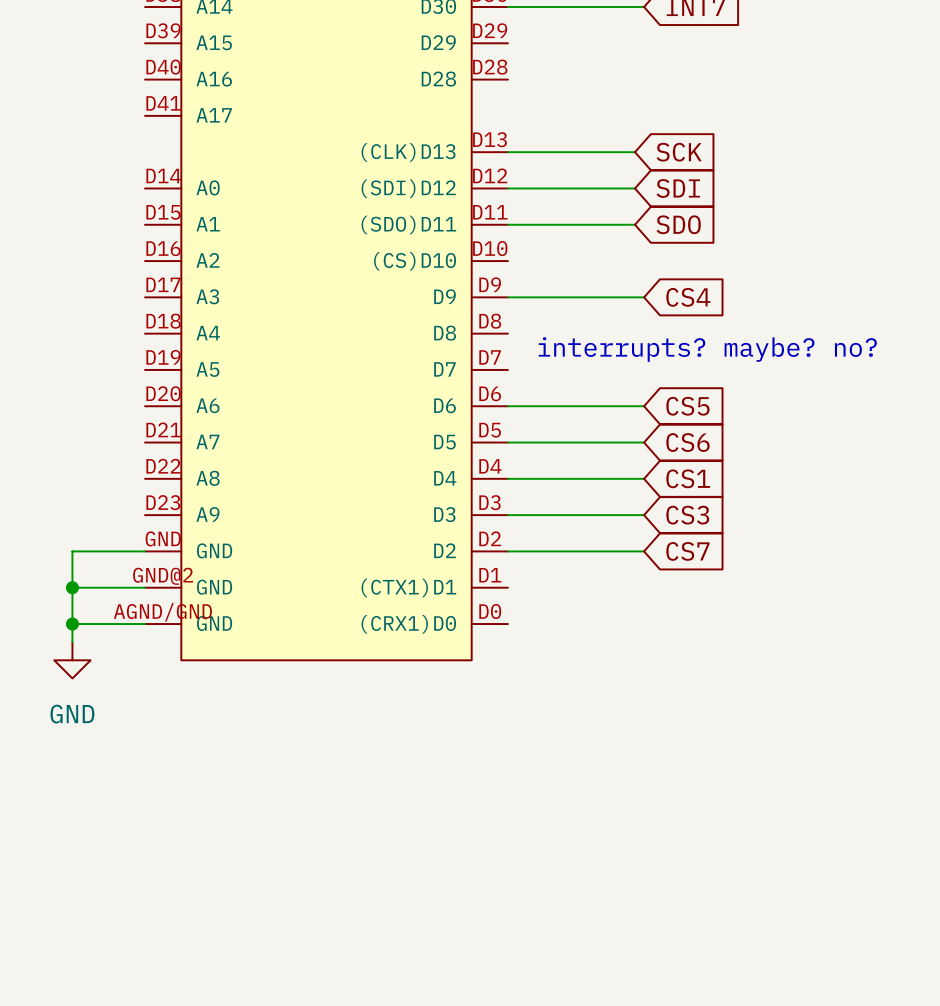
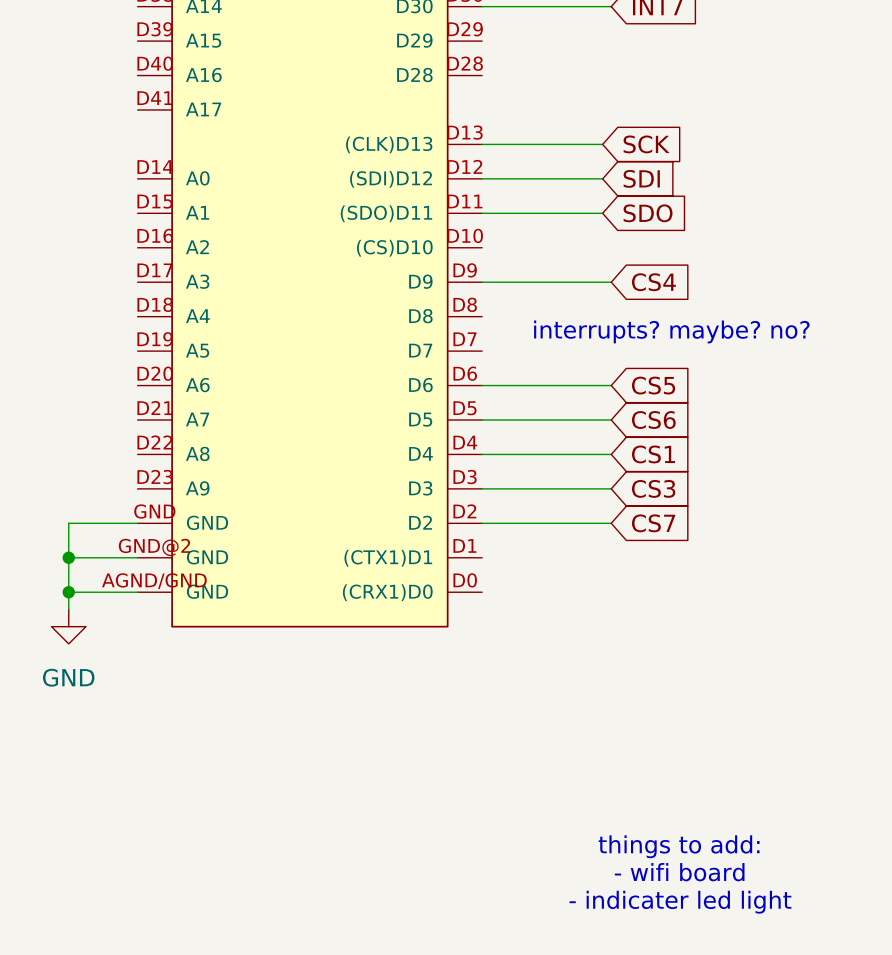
text: none -> things to add: (679, 846)
text: none -> - wifi board (679, 872)
text: none -> - indicater led light (680, 902)

